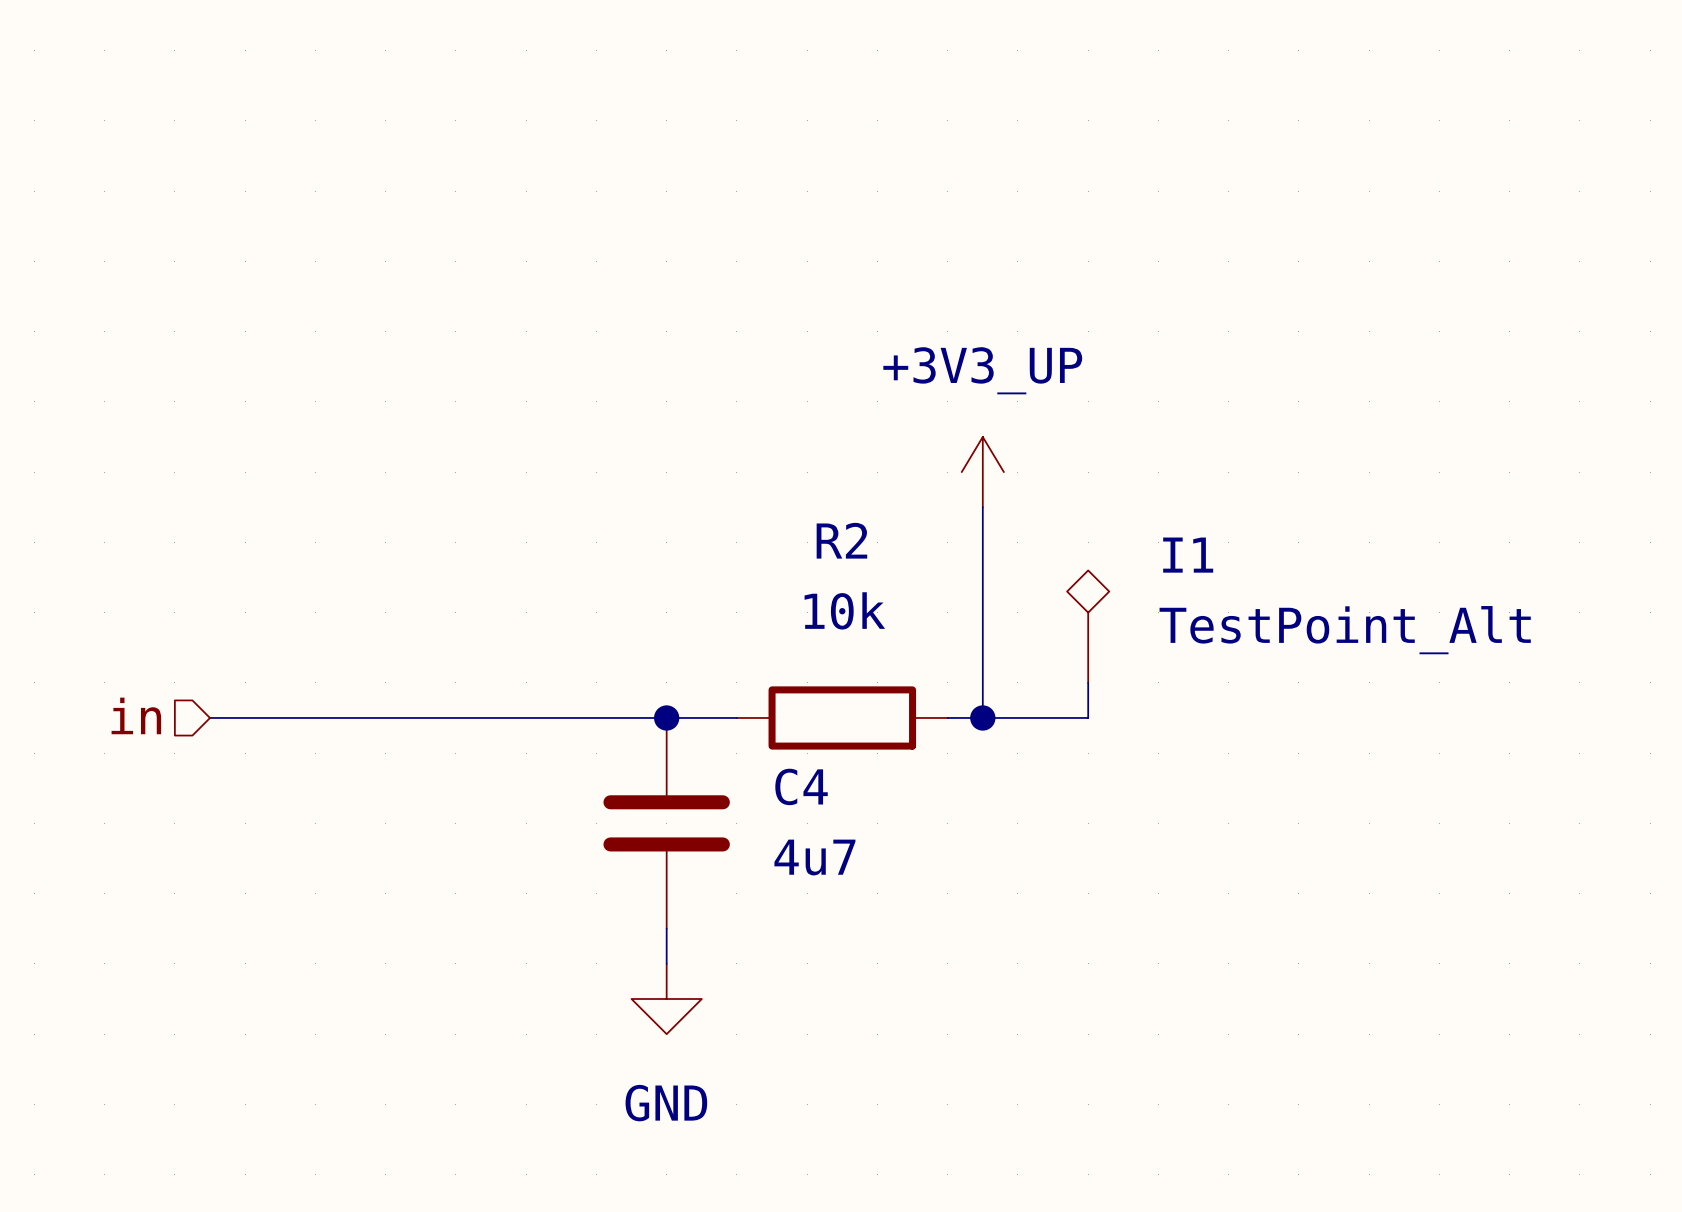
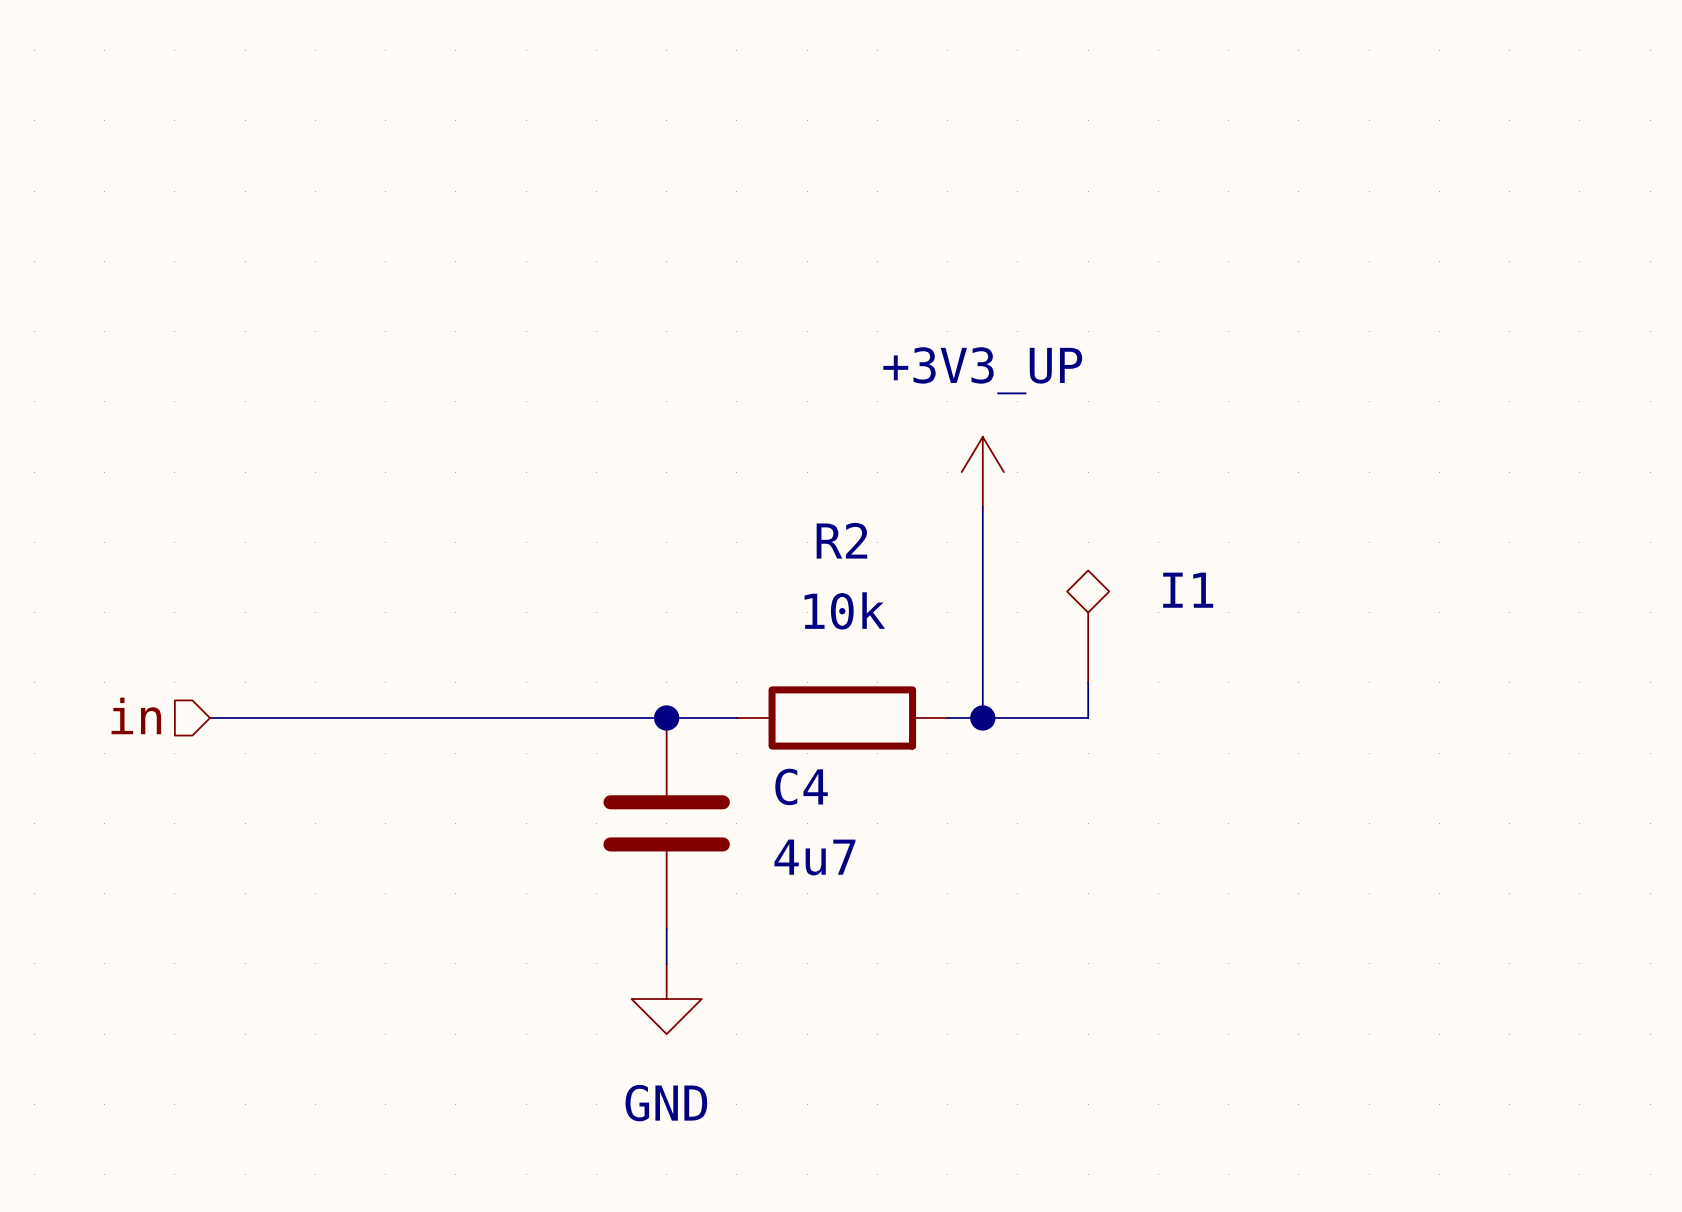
I1 name position: I1 (1188, 555) -> I1 (1188, 590)
I1 value: TestPoint_Alt (1345, 630) -> none

